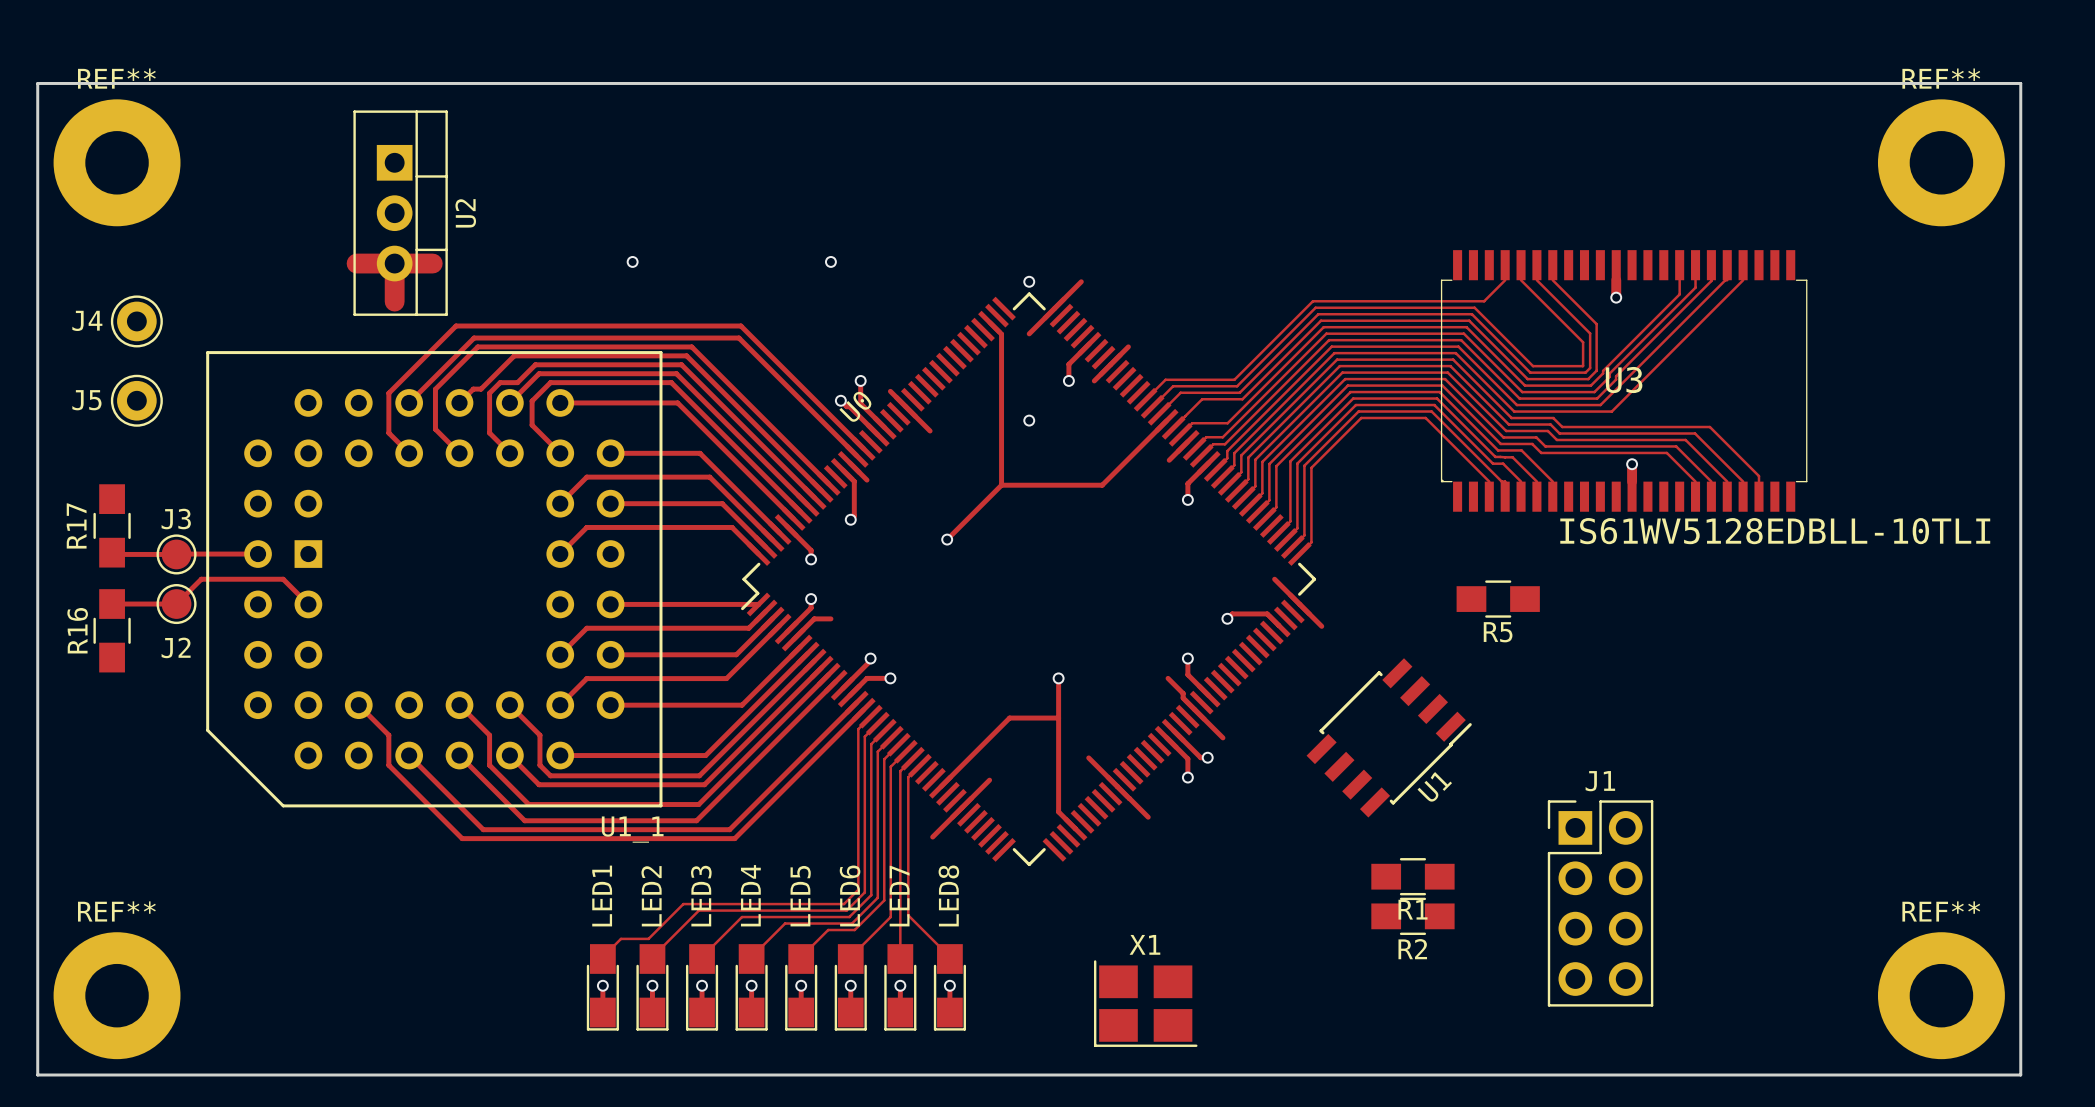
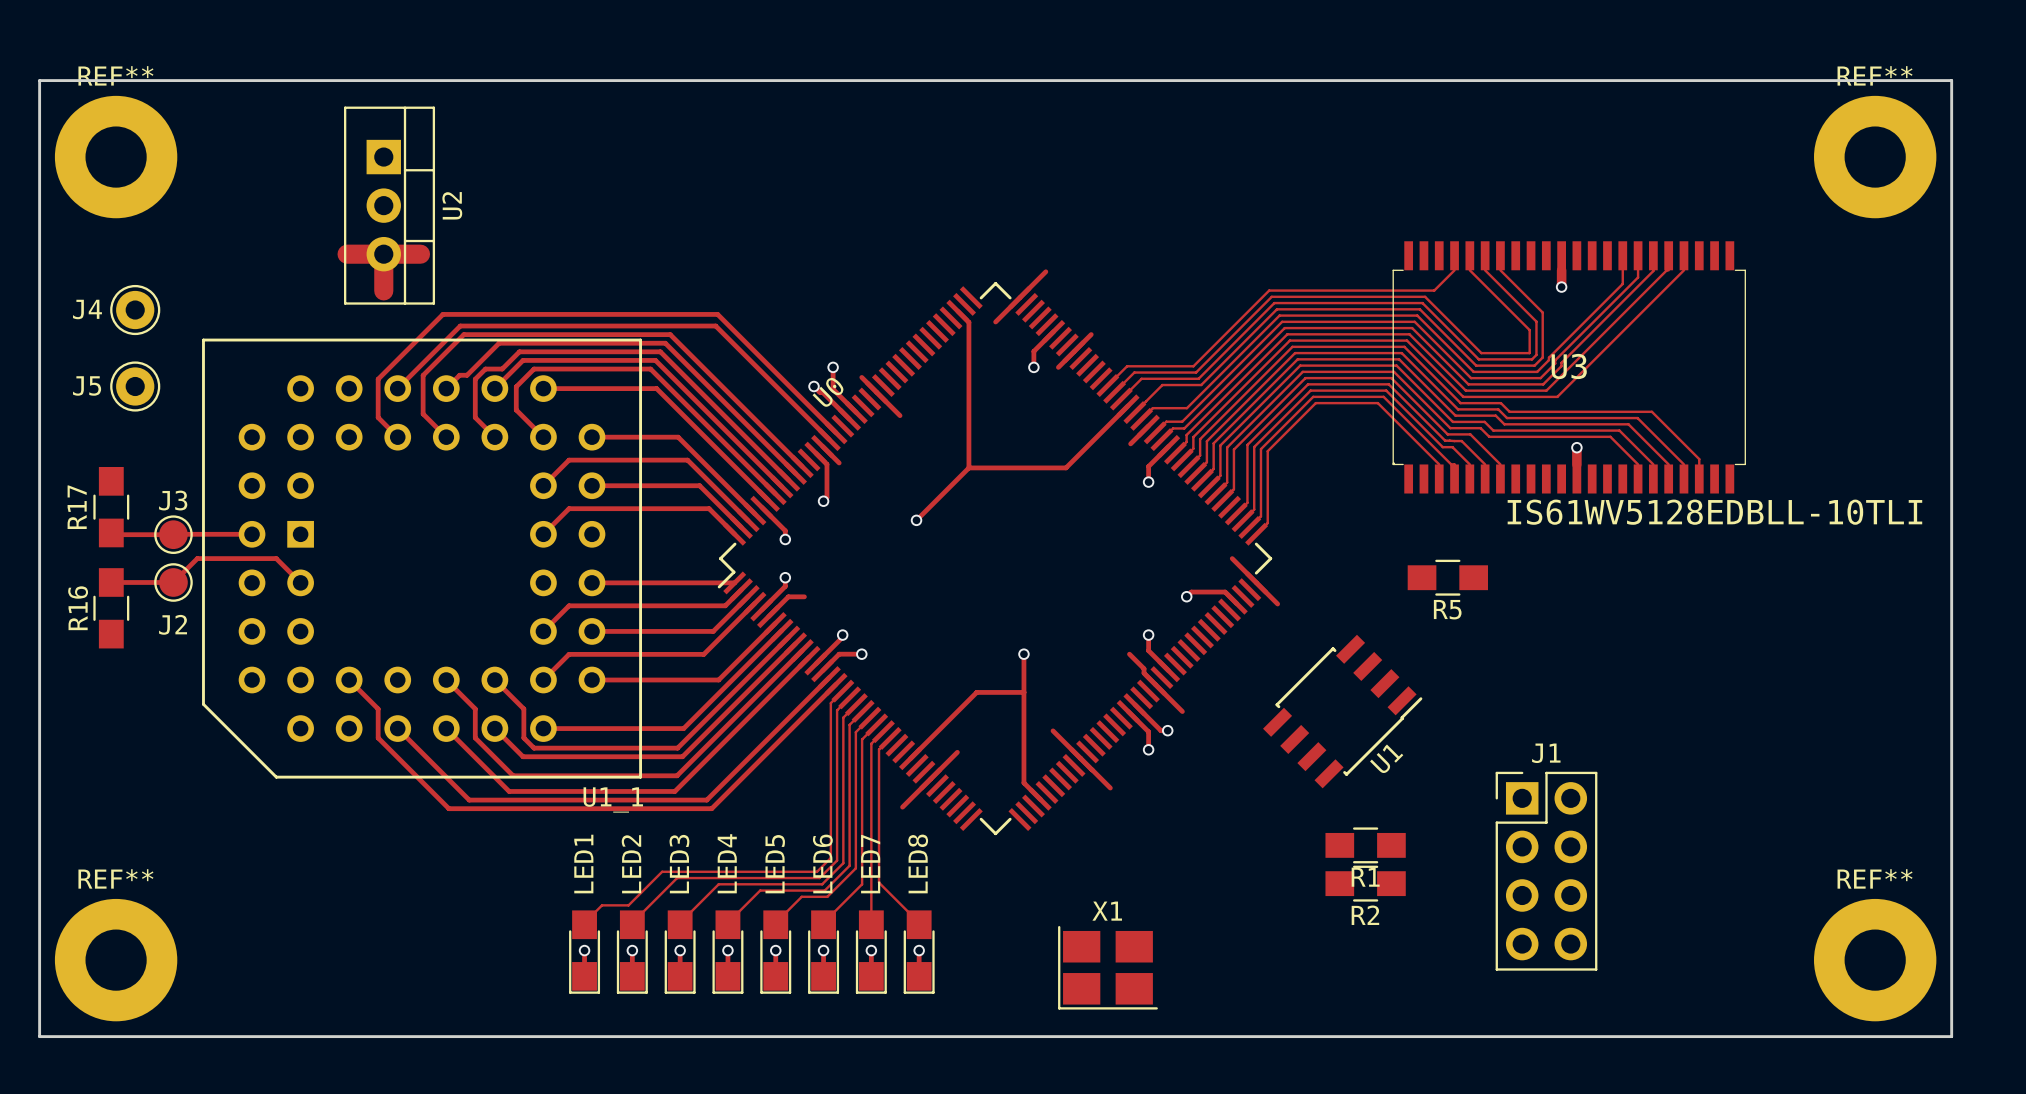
via: (632, 261) -> none
via: (830, 261) -> none
via: (1029, 281) -> none
via: (1029, 420) -> none

